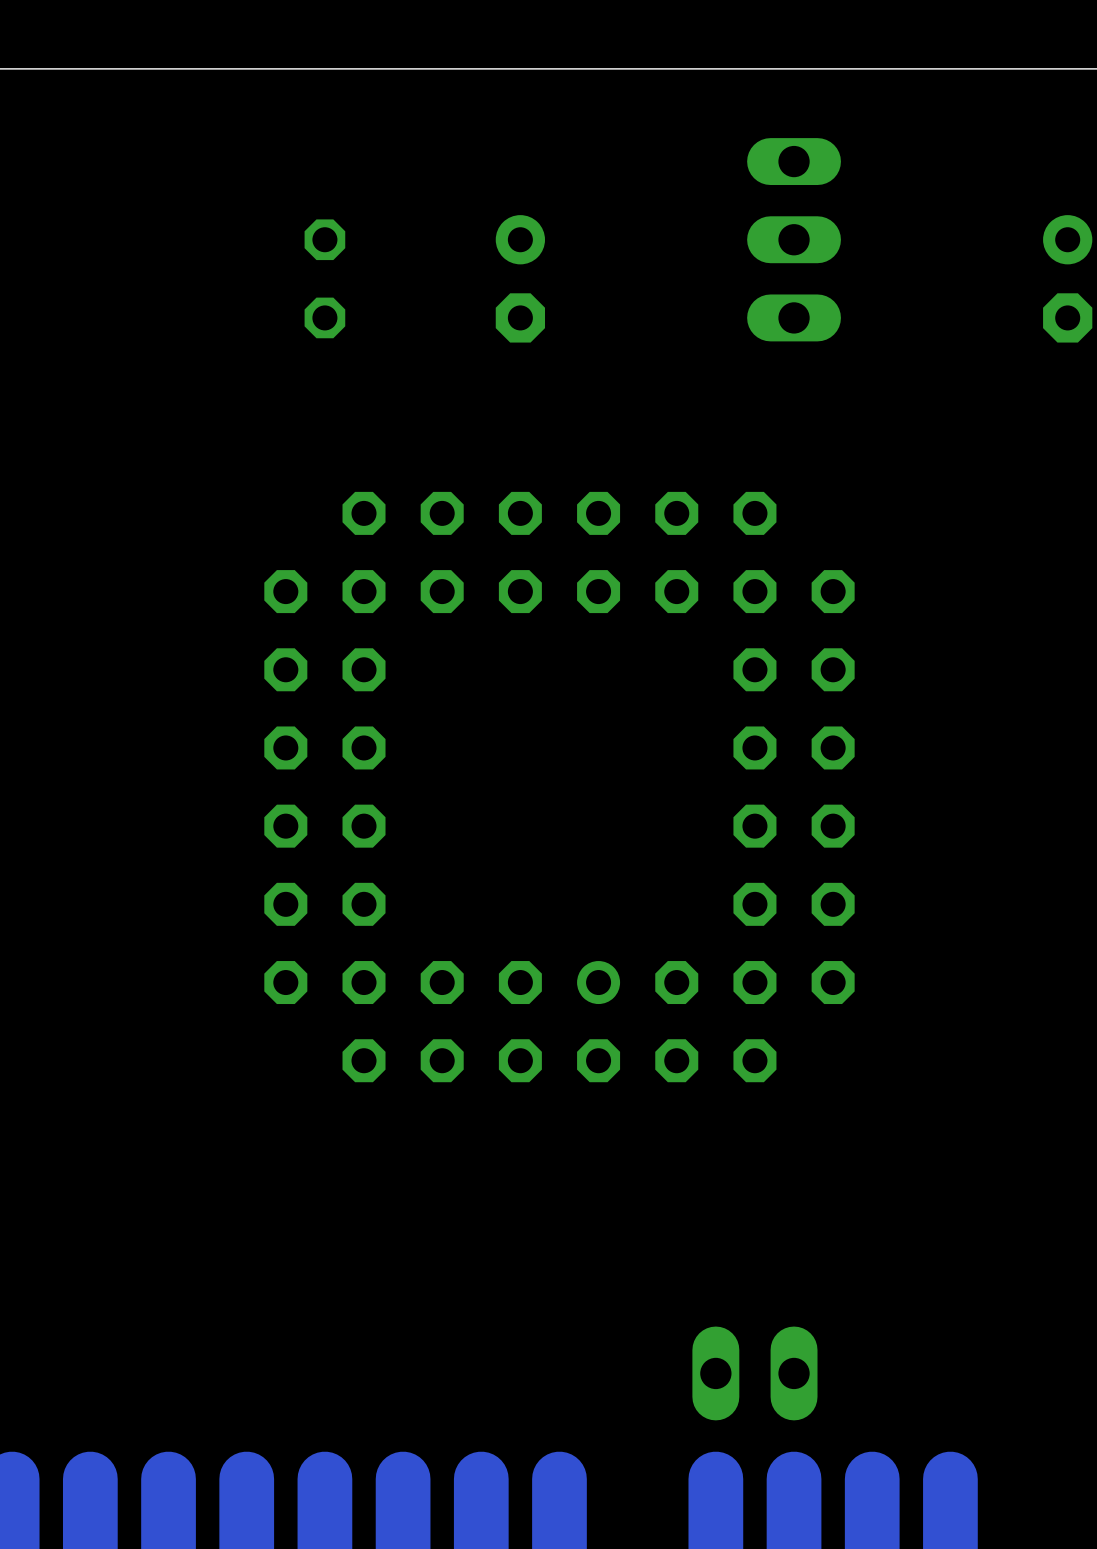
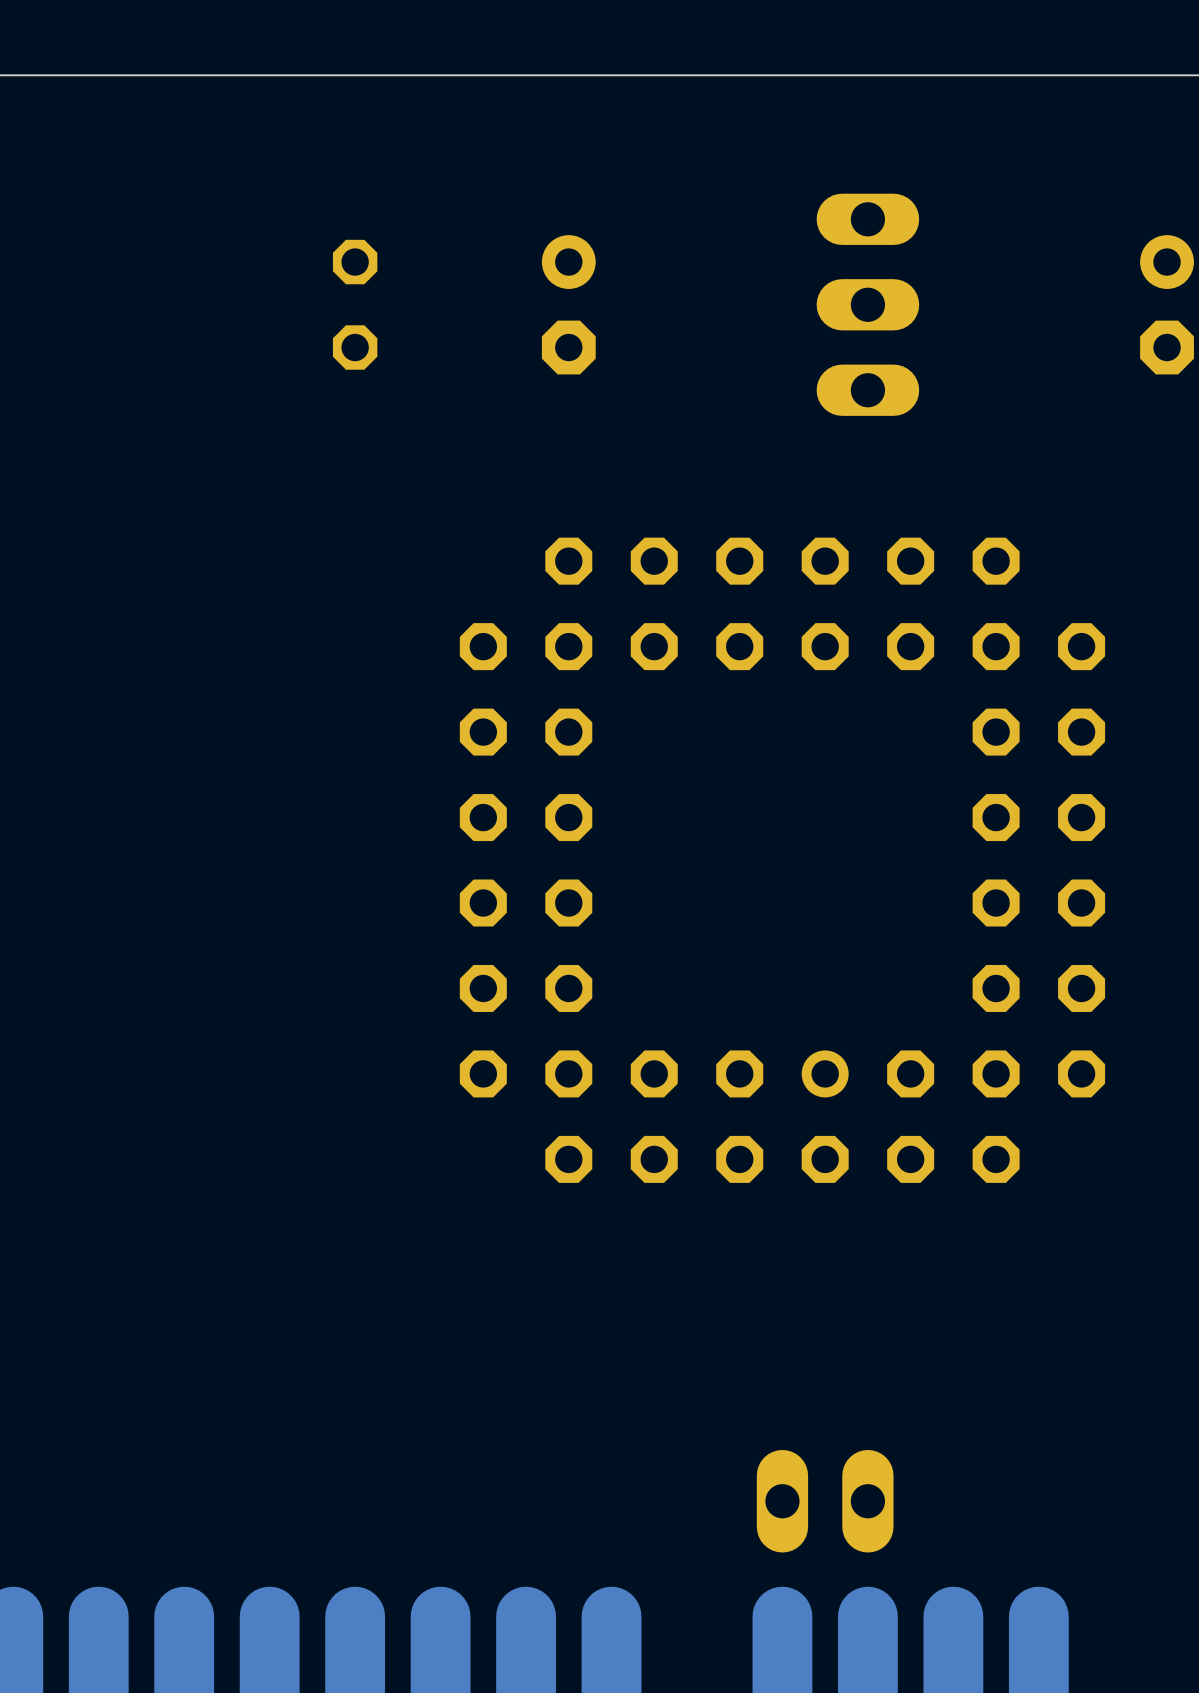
part position: (794, 239) -> (867, 304)
part position: (559, 787) -> (782, 860)

